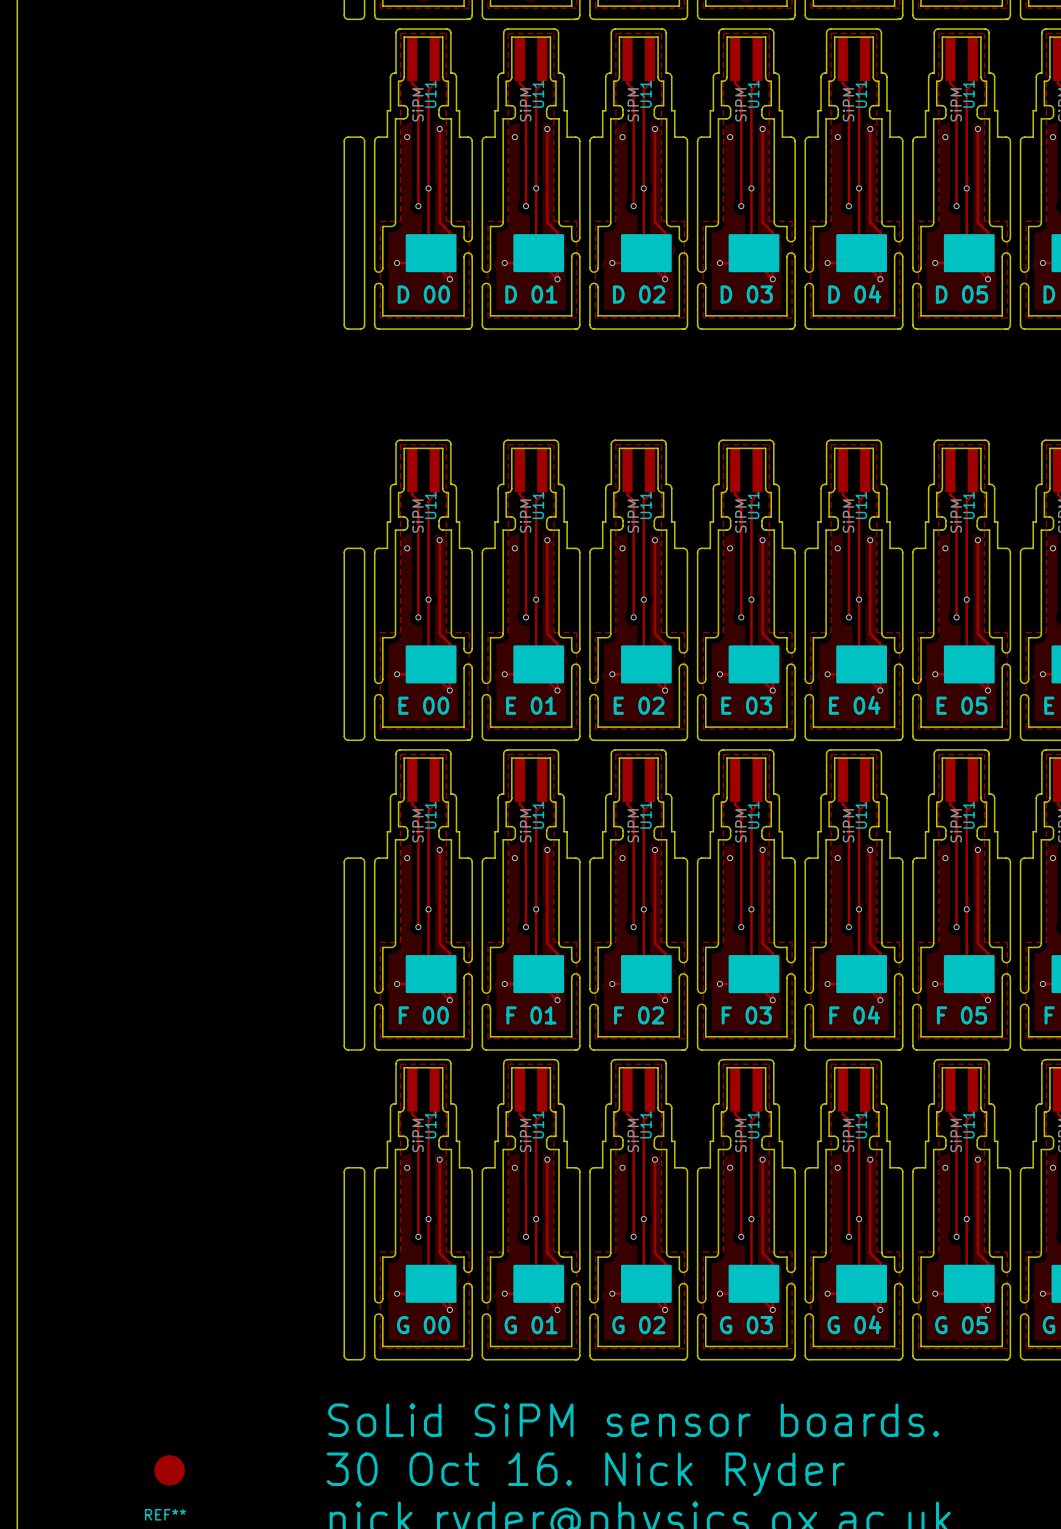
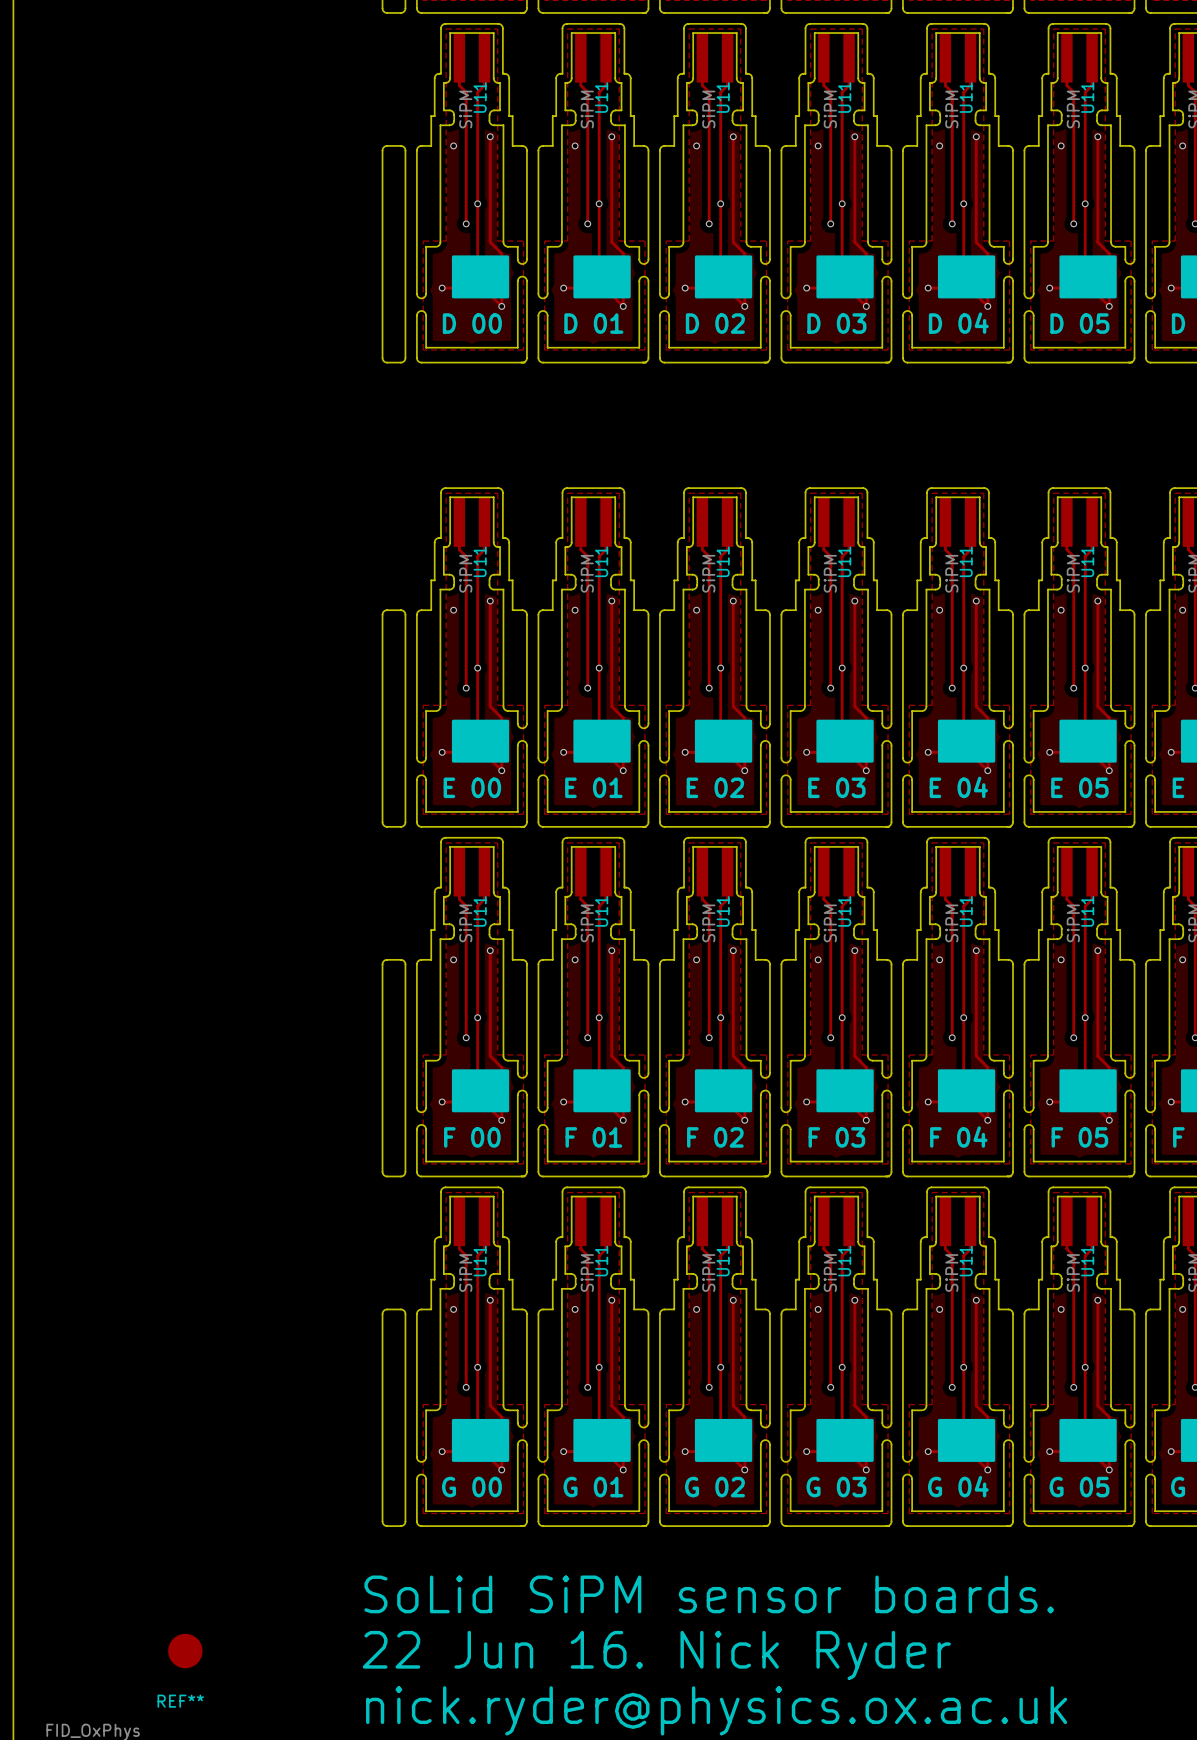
text: 30 Oct 16. Nick Ryder (585, 1474) -> 22 Jun 16. Nick Ryder (656, 1655)

